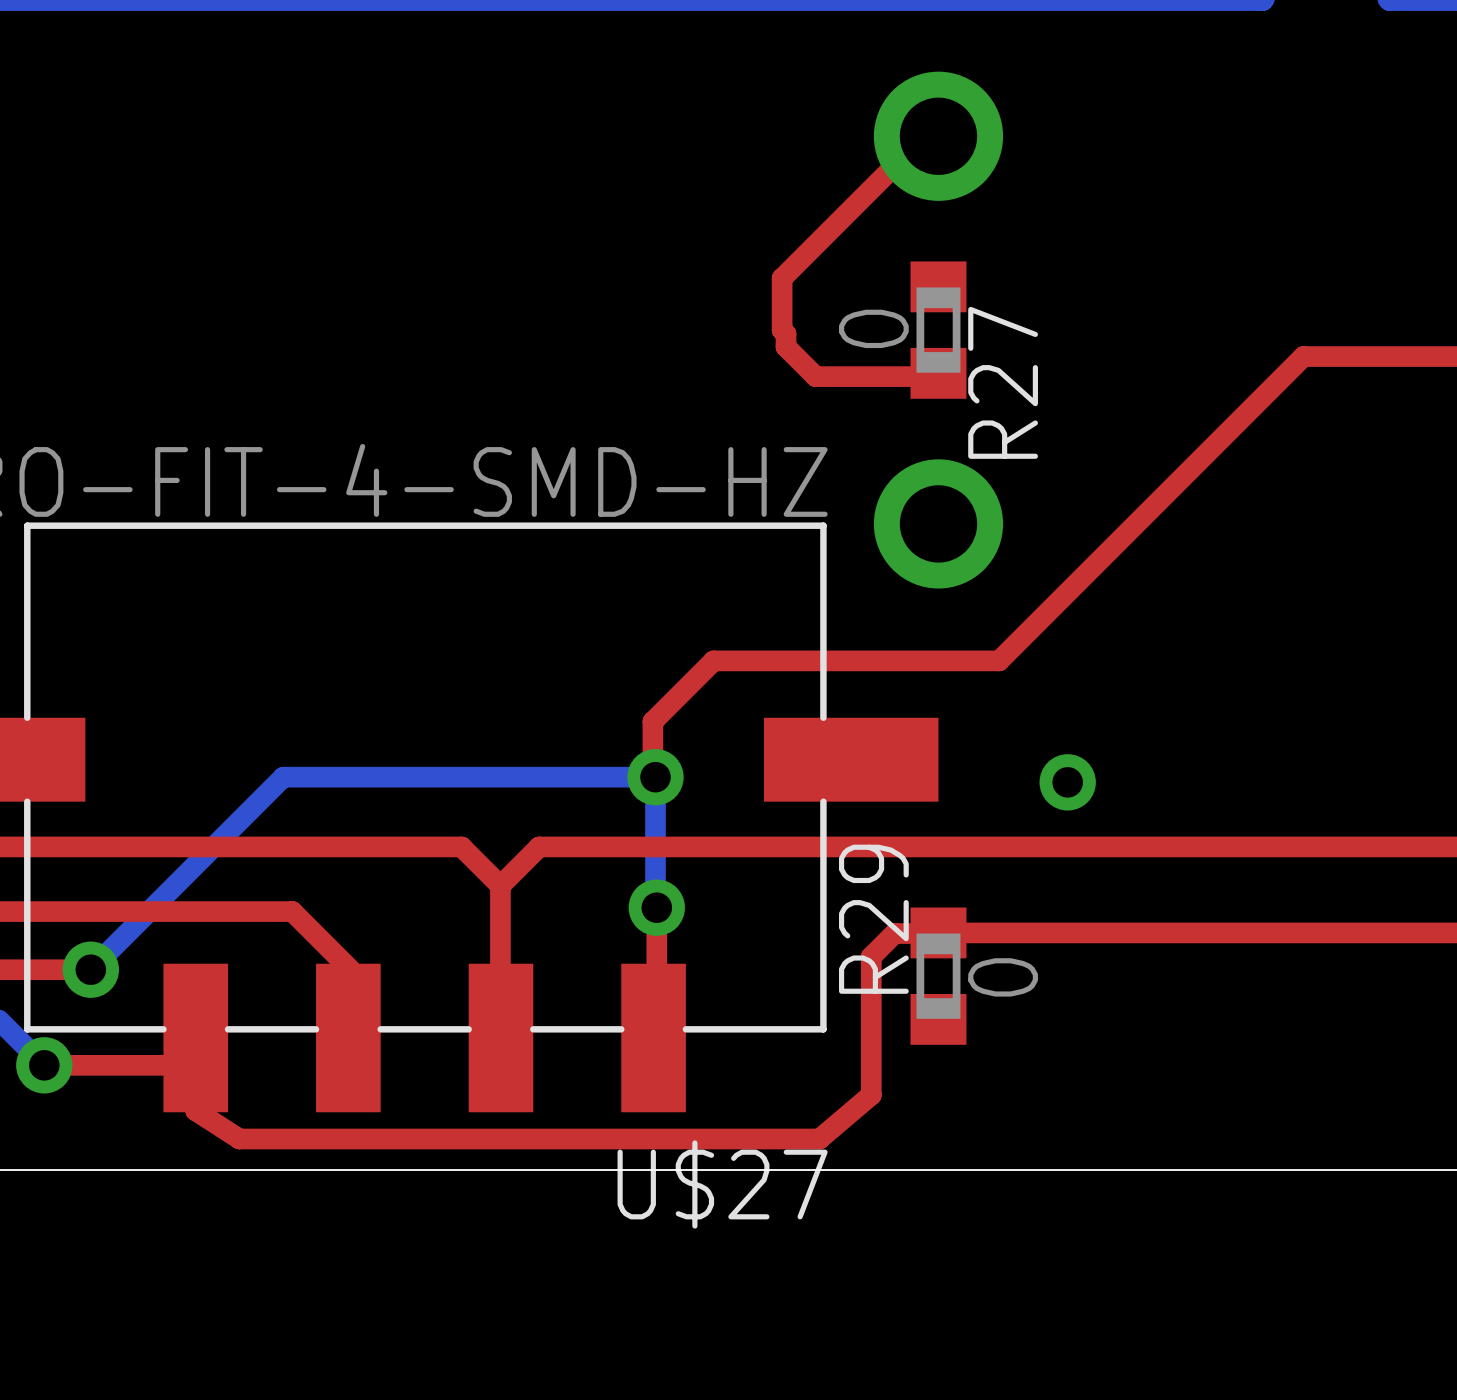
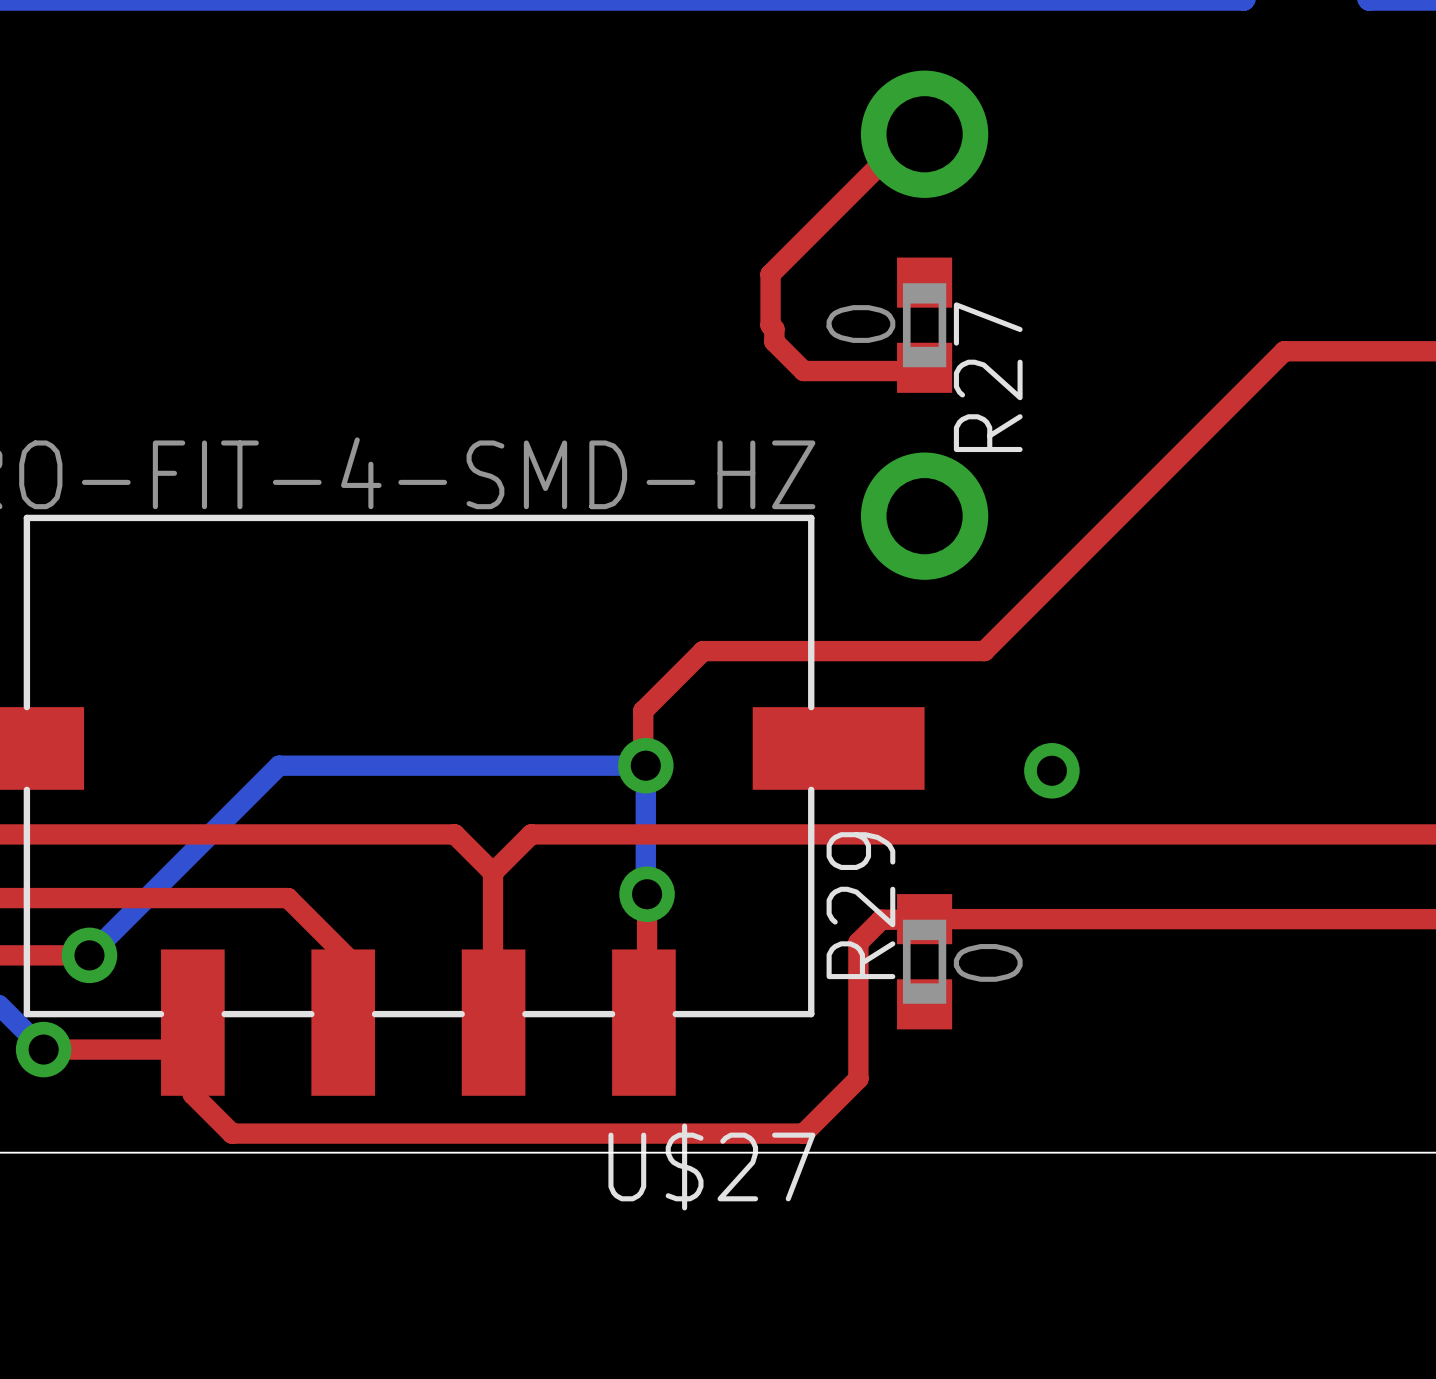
top track: (871, 1095) (819, 1138) (239, 1138) (195, 1110) -> (858, 1078) (803, 1133) (232, 1133) (192, 1094)

